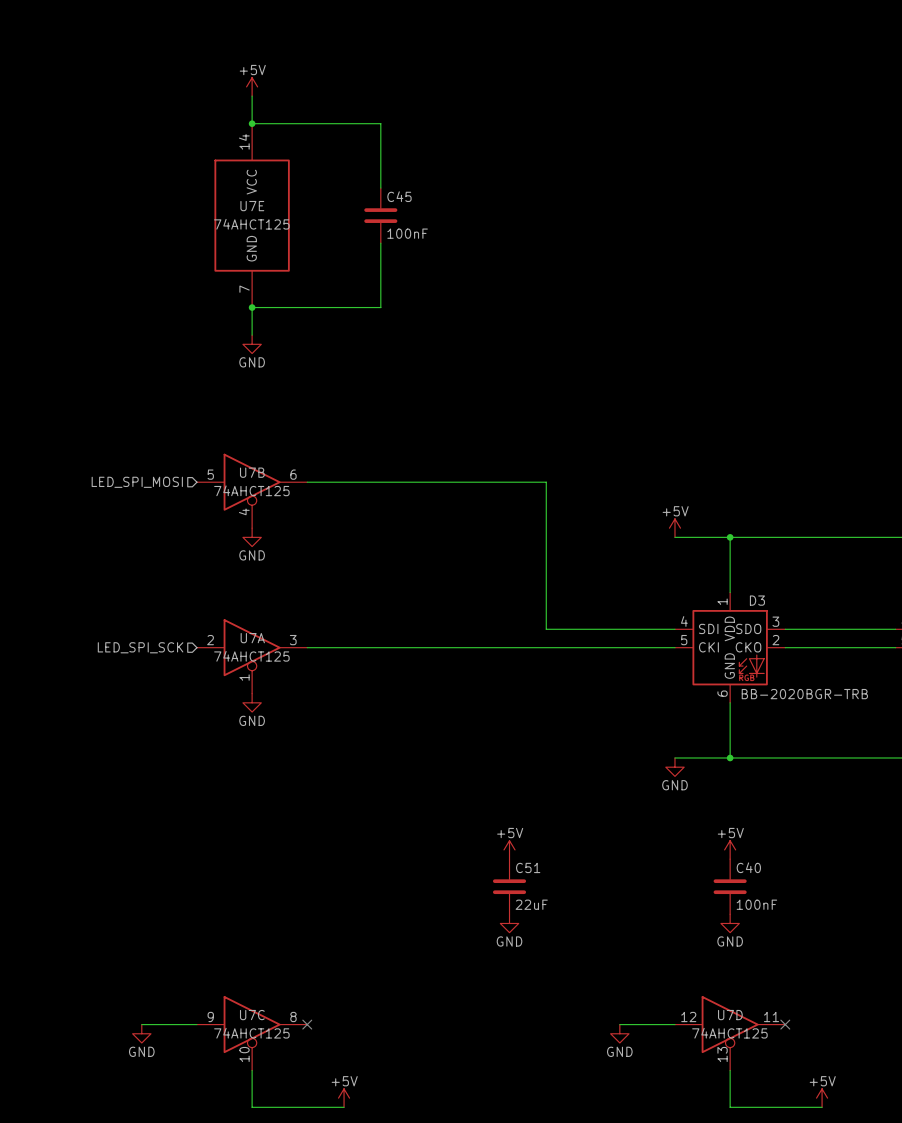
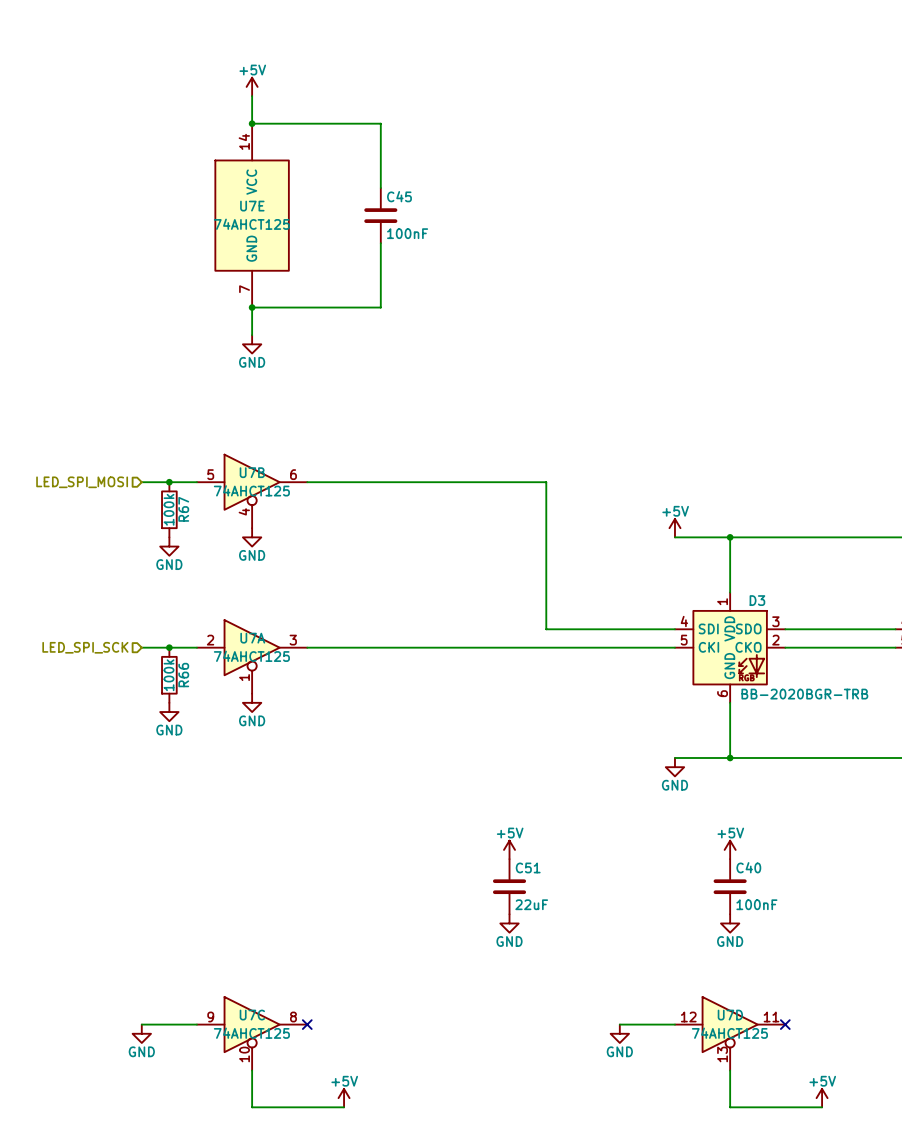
hierarchical label position: LED_SPI_MOSI (137, 482) -> LED_SPI_MOSI (82, 482)
wire: none -> (141, 482) (196, 482)
junction: none -> (169, 482)
R67: none -> 100k (169, 509)
power symbol: none -> GND (169, 546)
hierarchical label position: LED_SPI_SCK (140, 647) -> LED_SPI_SCK (85, 647)
wire: none -> (141, 647) (196, 647)
junction: none -> (169, 647)
R66: none -> 100k (169, 675)
power symbol: none -> GND (169, 712)

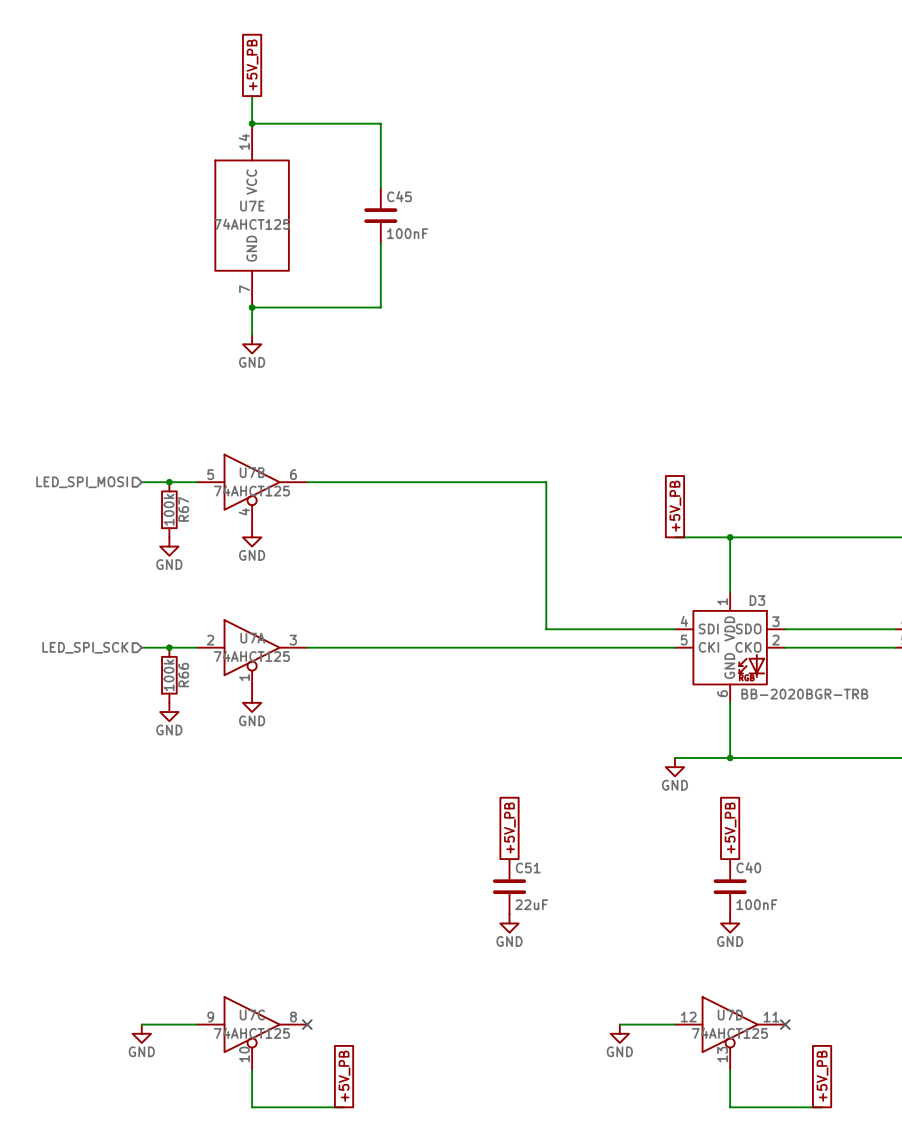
global label: none -> +5V_PB (252, 65)
power symbol: +5V (252, 86) -> none
global label: none -> +5V_PB (675, 506)
power symbol: +5V (674, 528) -> none
global label: none -> +5V_PB (509, 828)
global label: none -> +5V_PB (730, 828)
power symbol: +5V (509, 849) -> none
power symbol: +5V (730, 849) -> none
global label: none -> +5V_PB (344, 1076)
global label: none -> +5V_PB (822, 1076)
power symbol: +5V (344, 1098) -> none
power symbol: +5V (822, 1098) -> none

